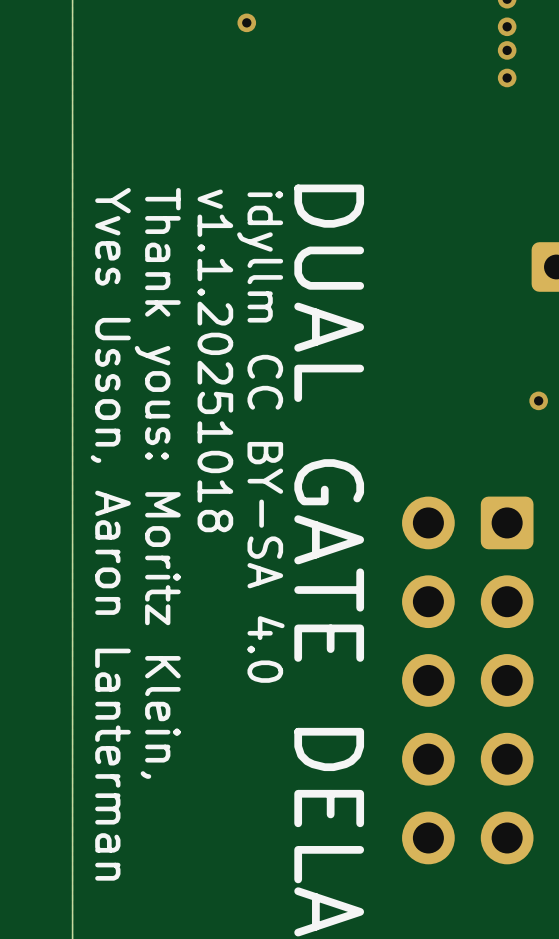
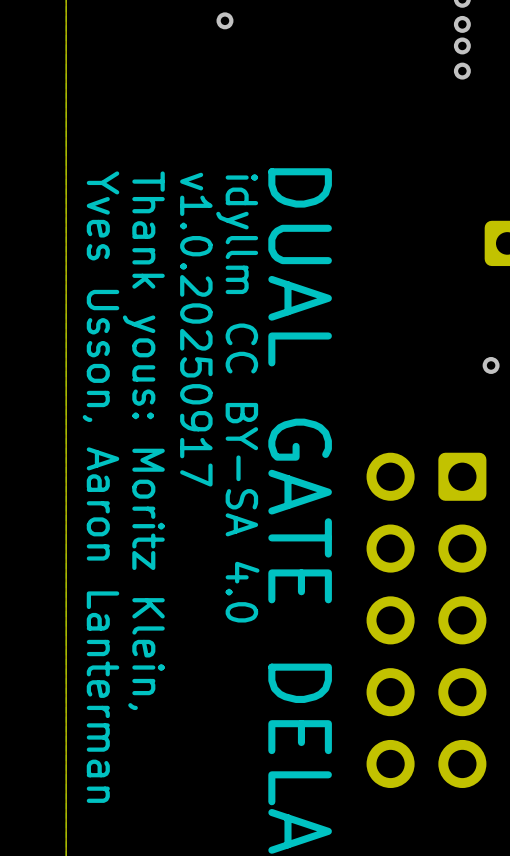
text: v1.1.20251018 (215, 360) -> v1.0.20250917 (196, 329)

